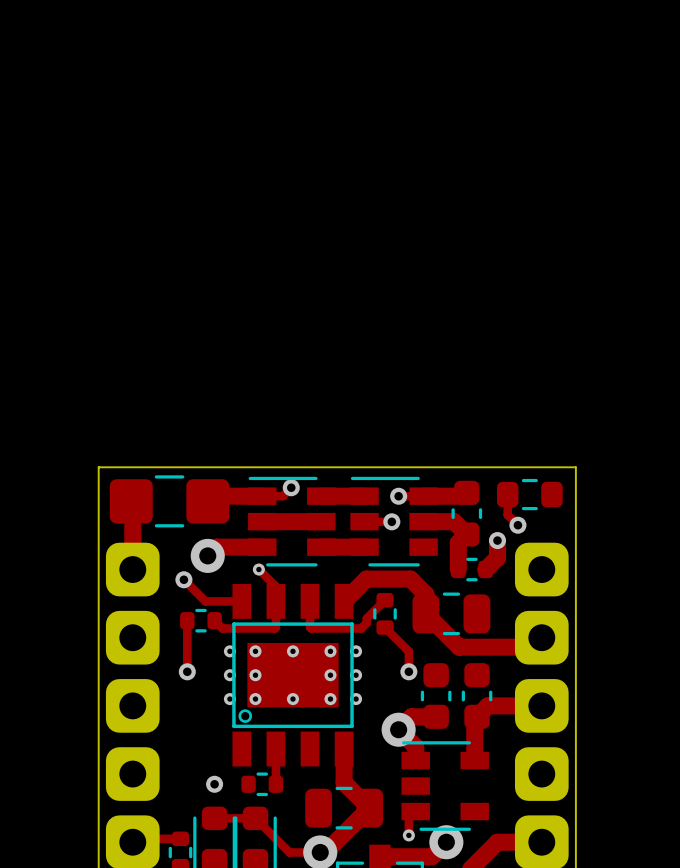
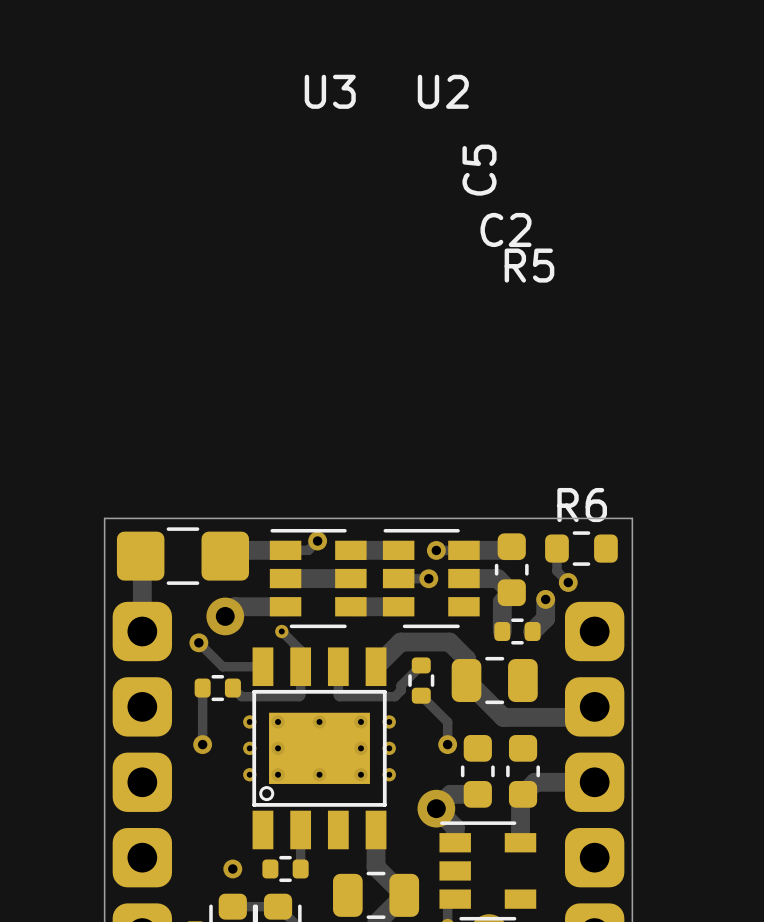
U3 name: none -> U3 (330, 91)
U2 name: none -> U2 (443, 91)
C5 name: none -> C5 (479, 170)
C2 name: none -> C2 (506, 229)
R5 name: none -> R5 (529, 265)
R6 name: none -> R6 (582, 505)

